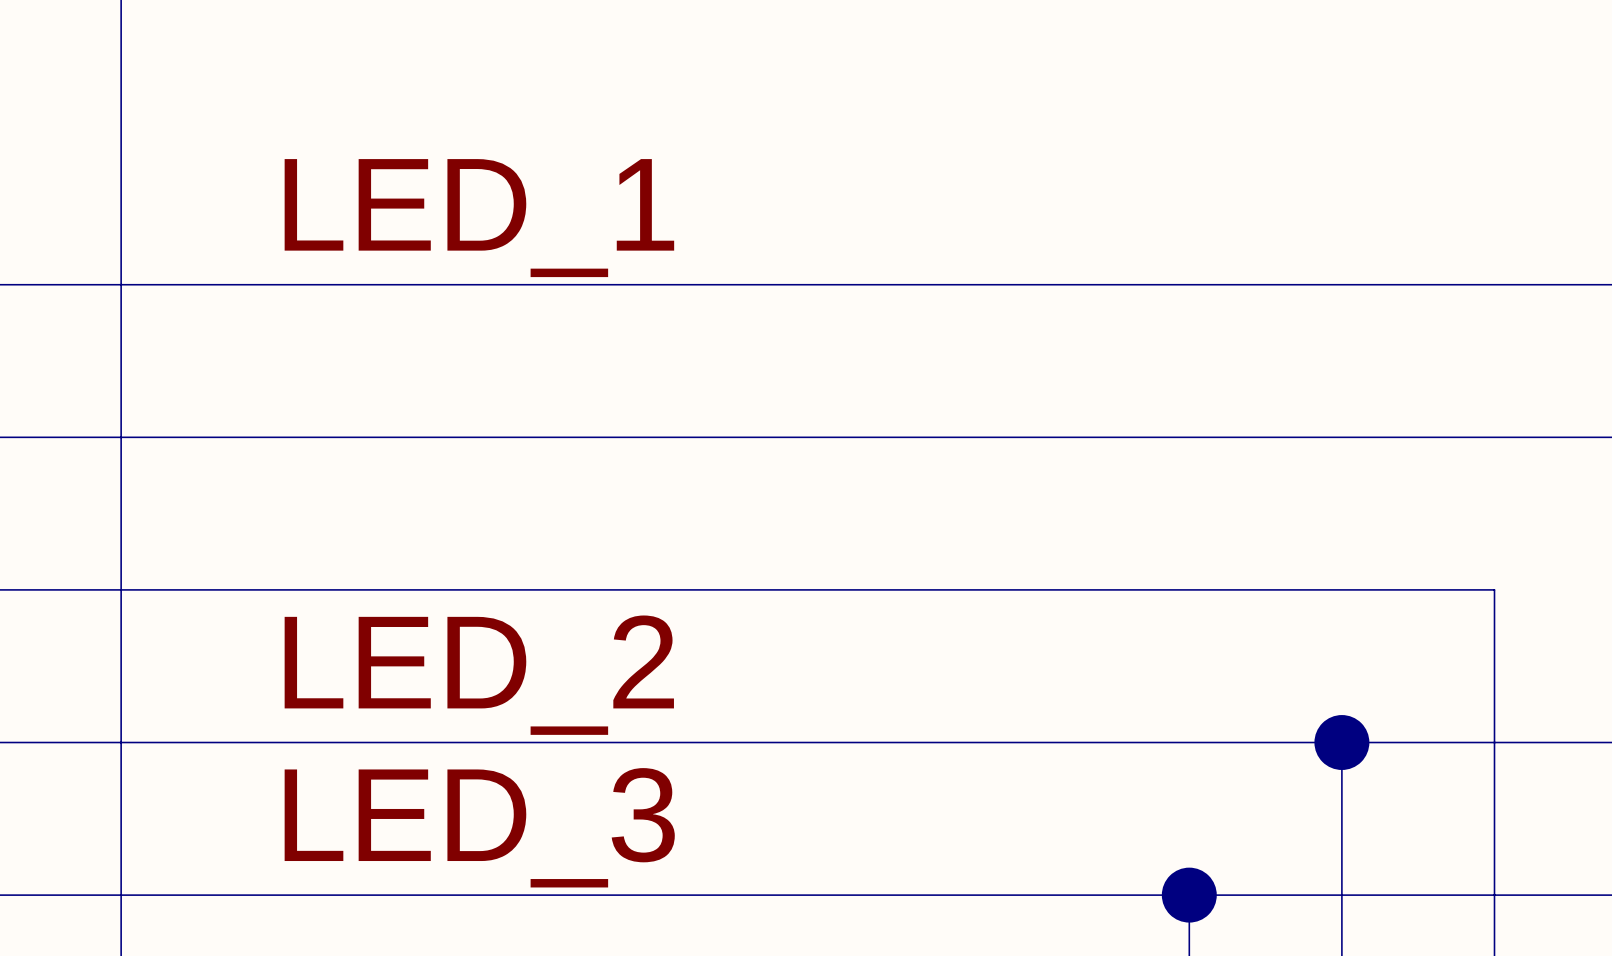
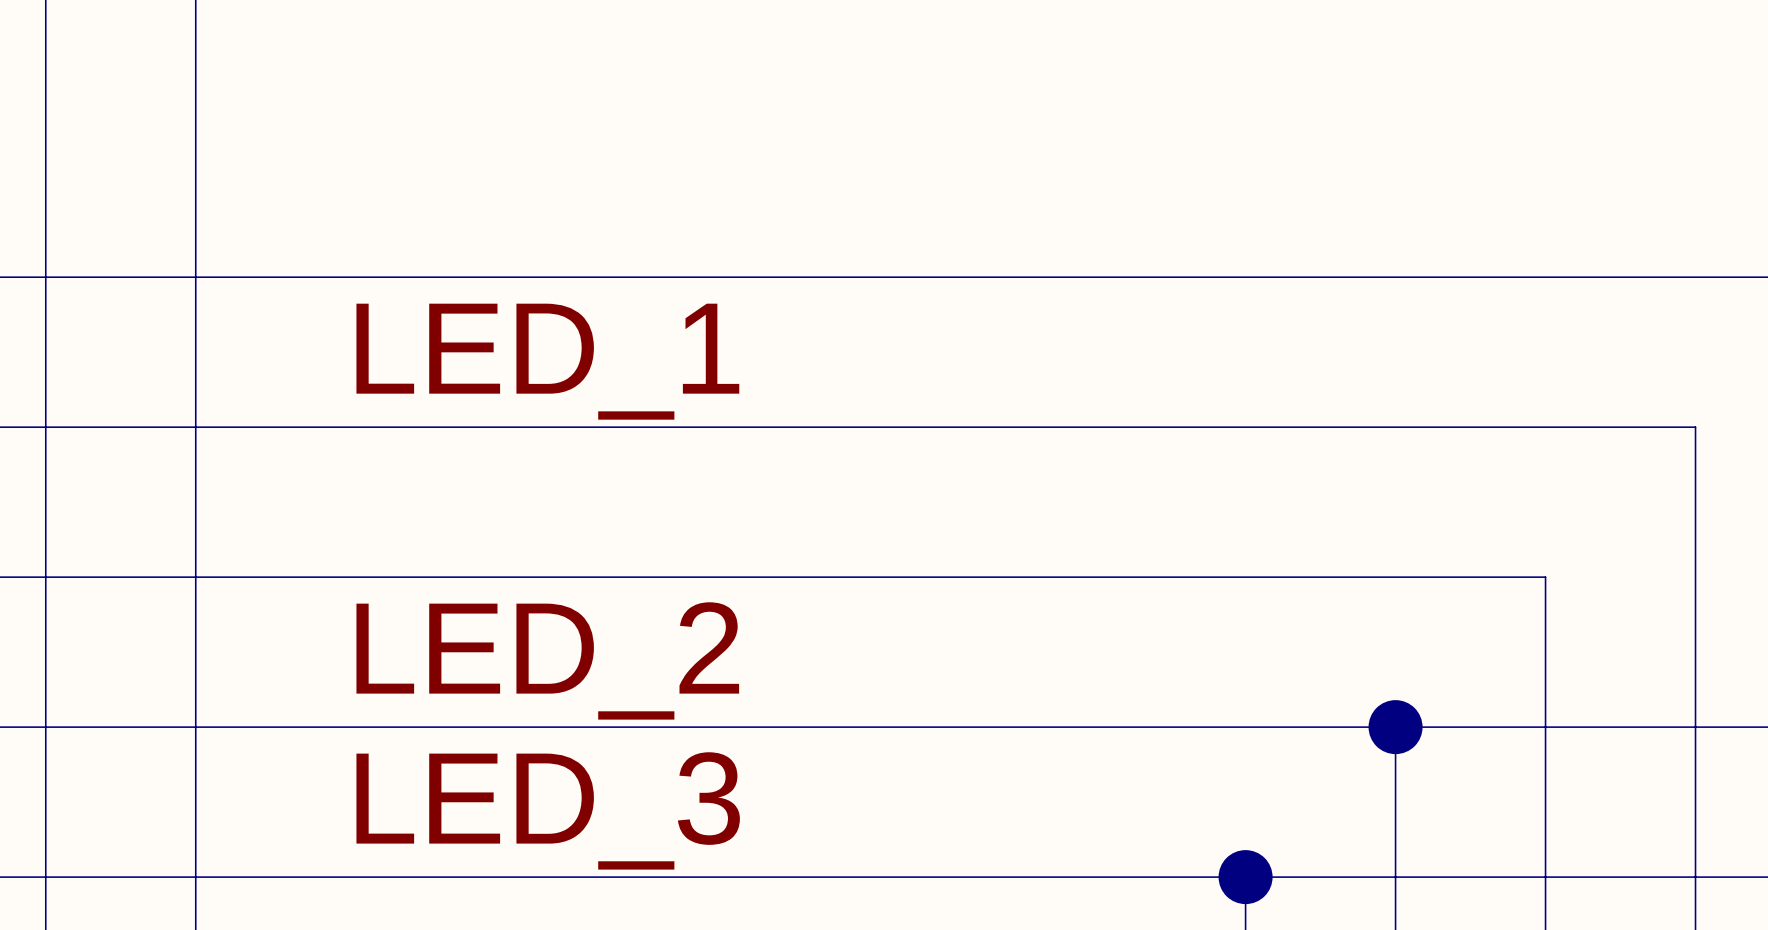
label position: LED_1 (479, 218) -> LED_1 (547, 361)

